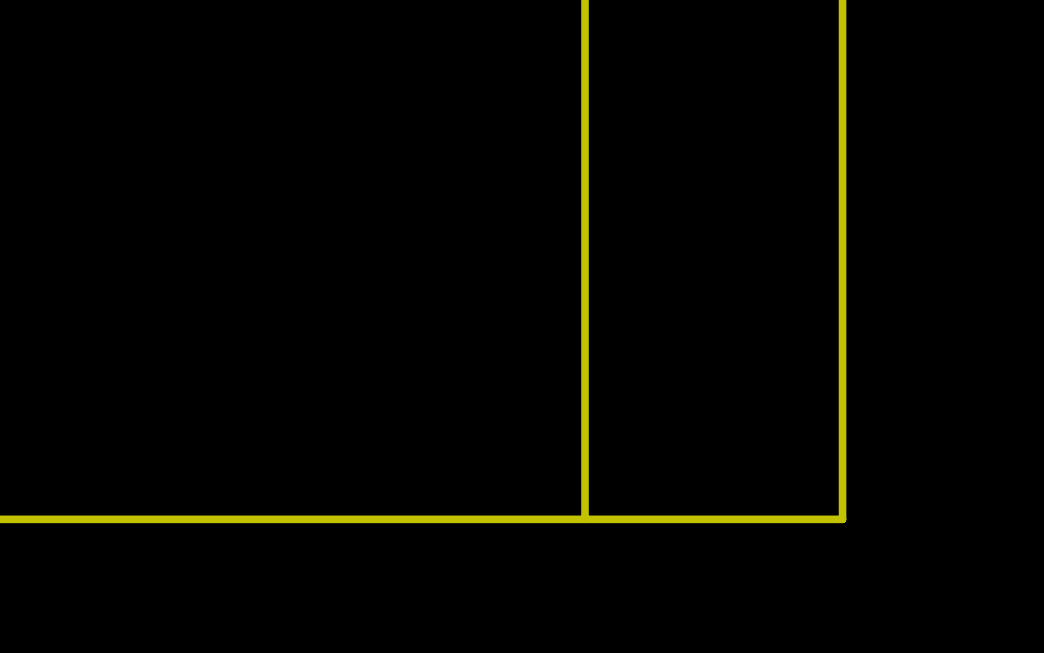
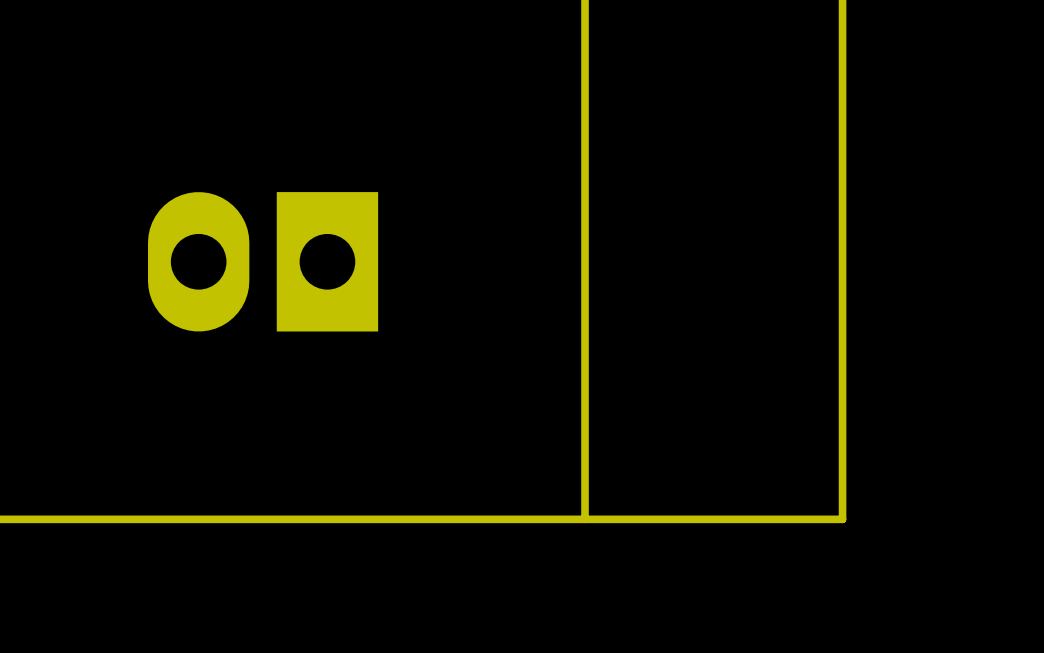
part: none -> (263, 261)

